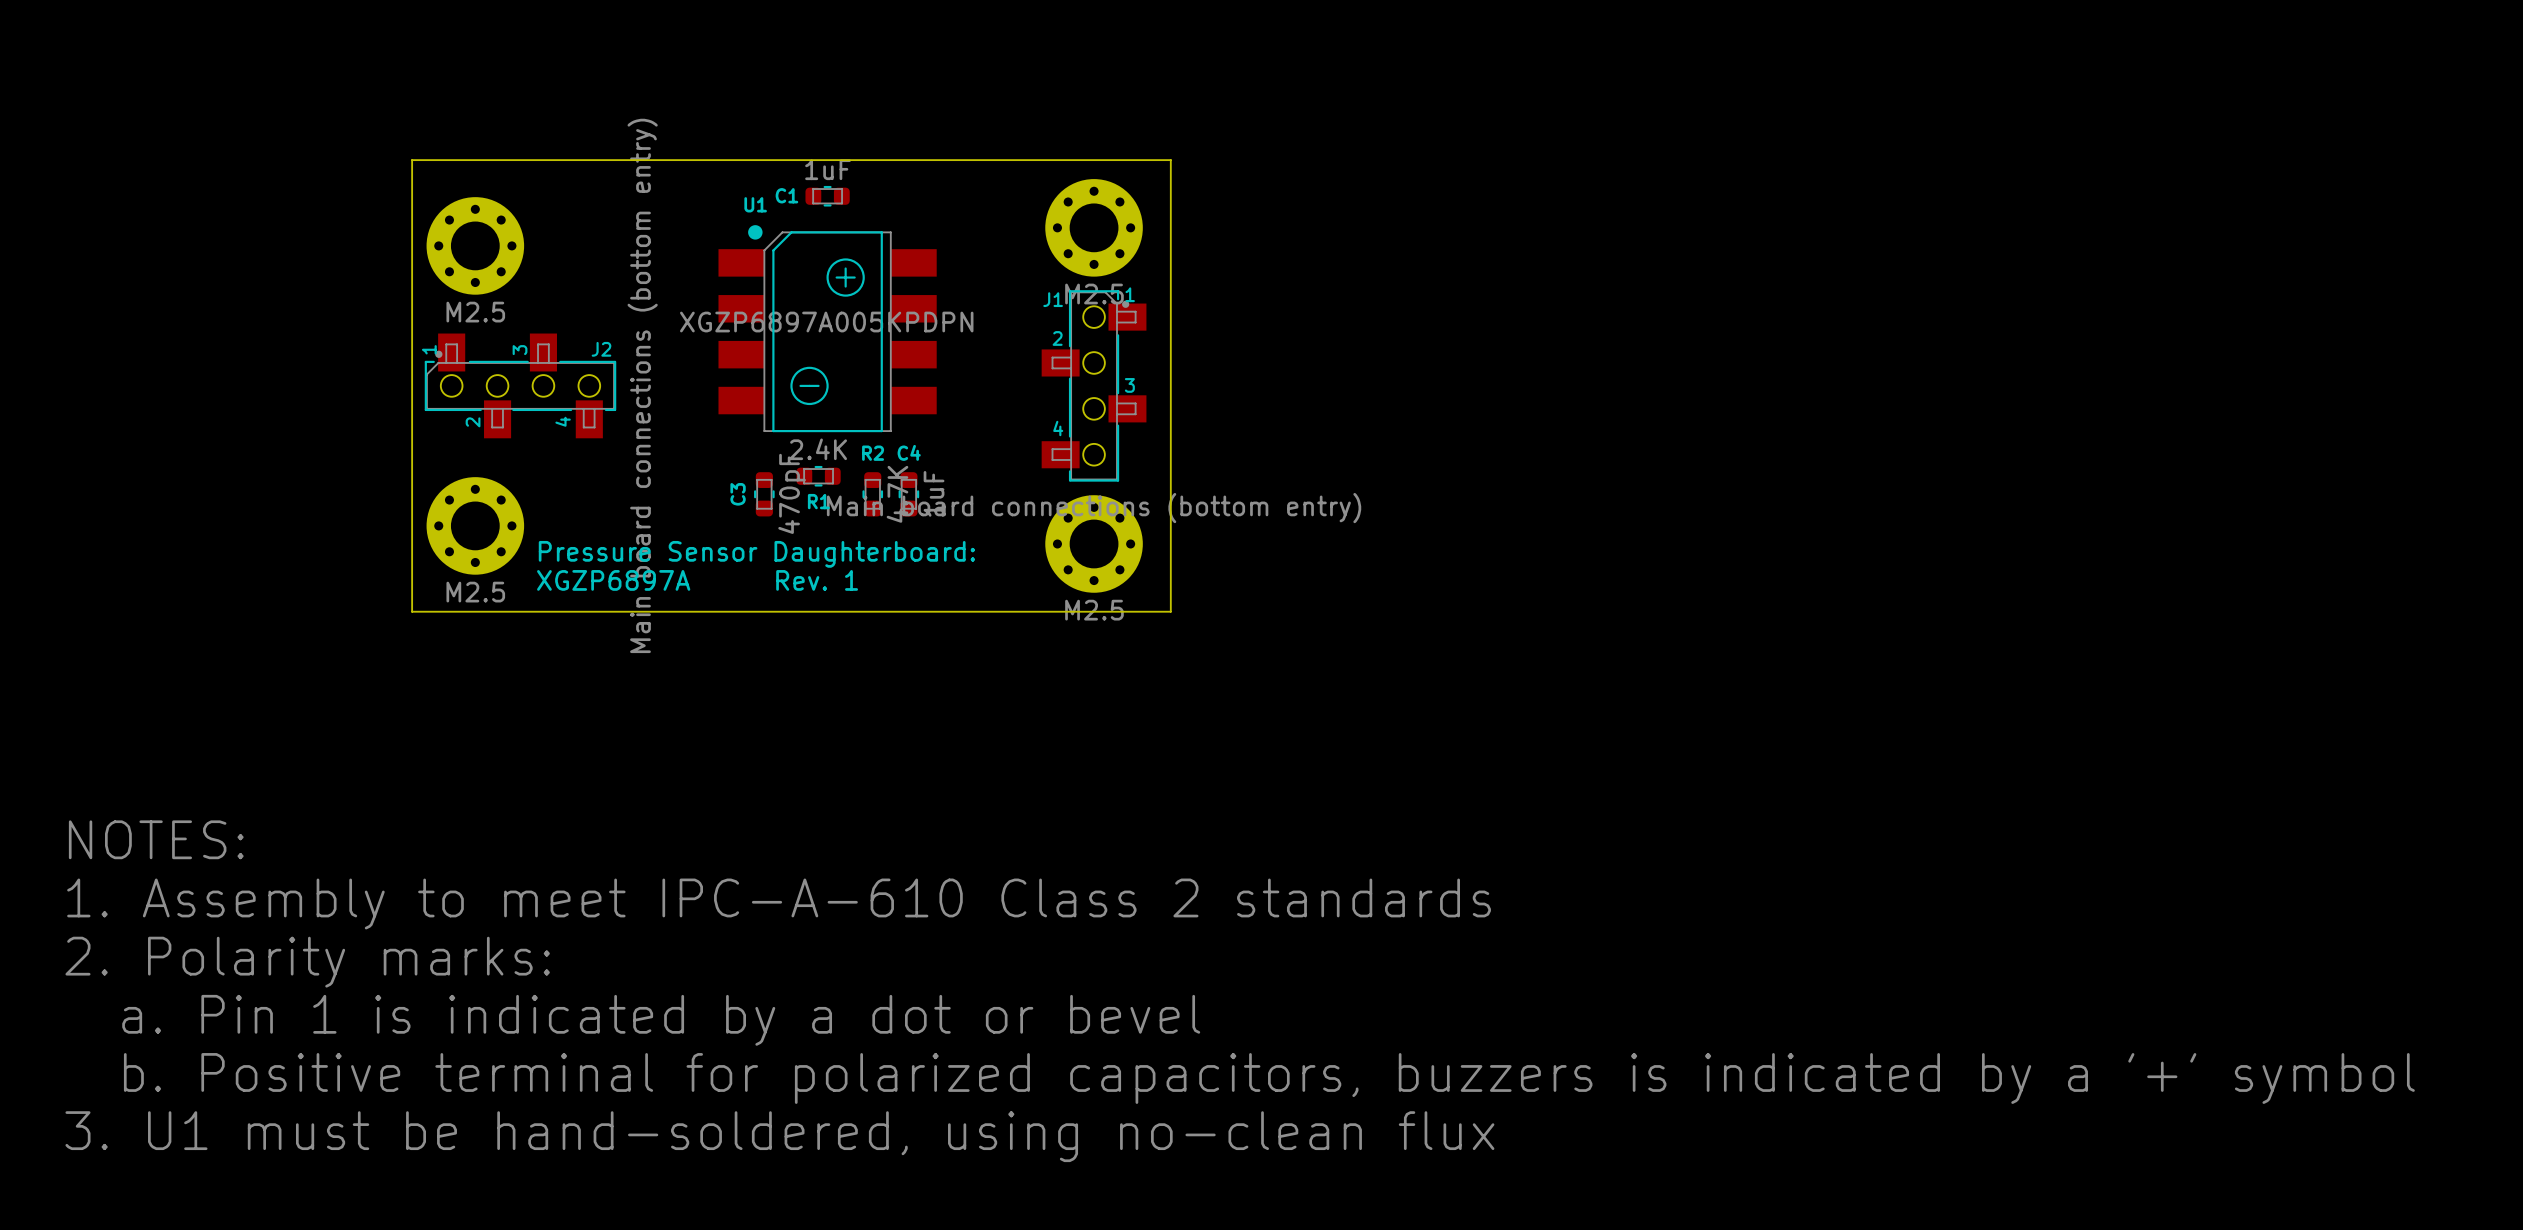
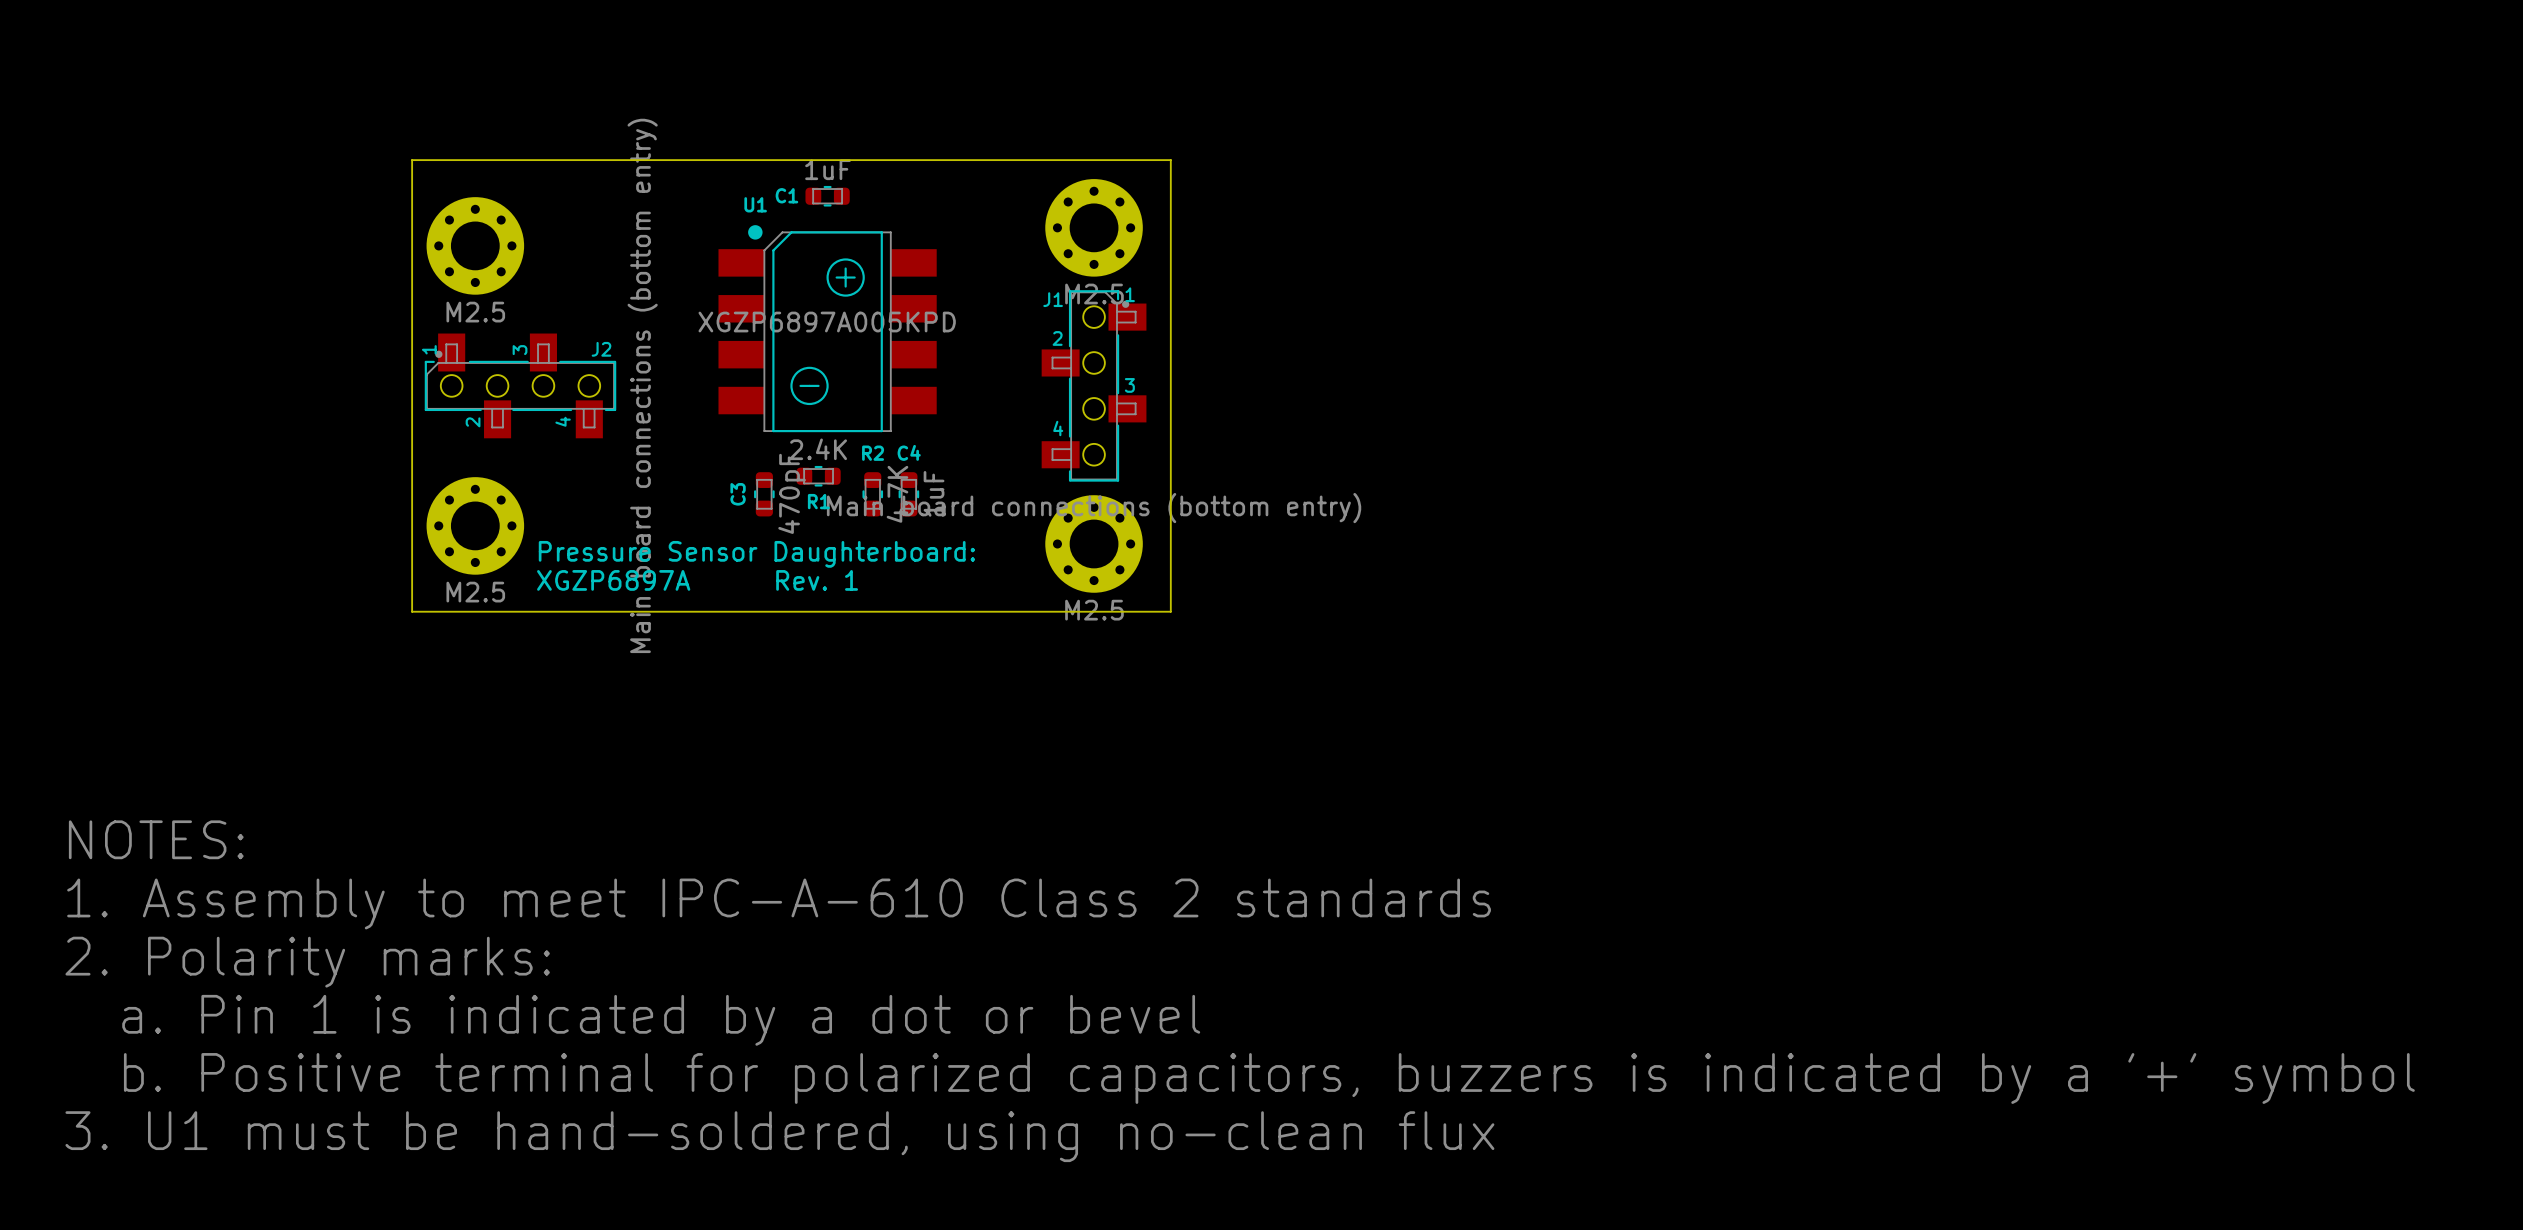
U1 value: XGZP6897A005KPDPN (826, 322) -> XGZP6897A005KPD (827, 322)

